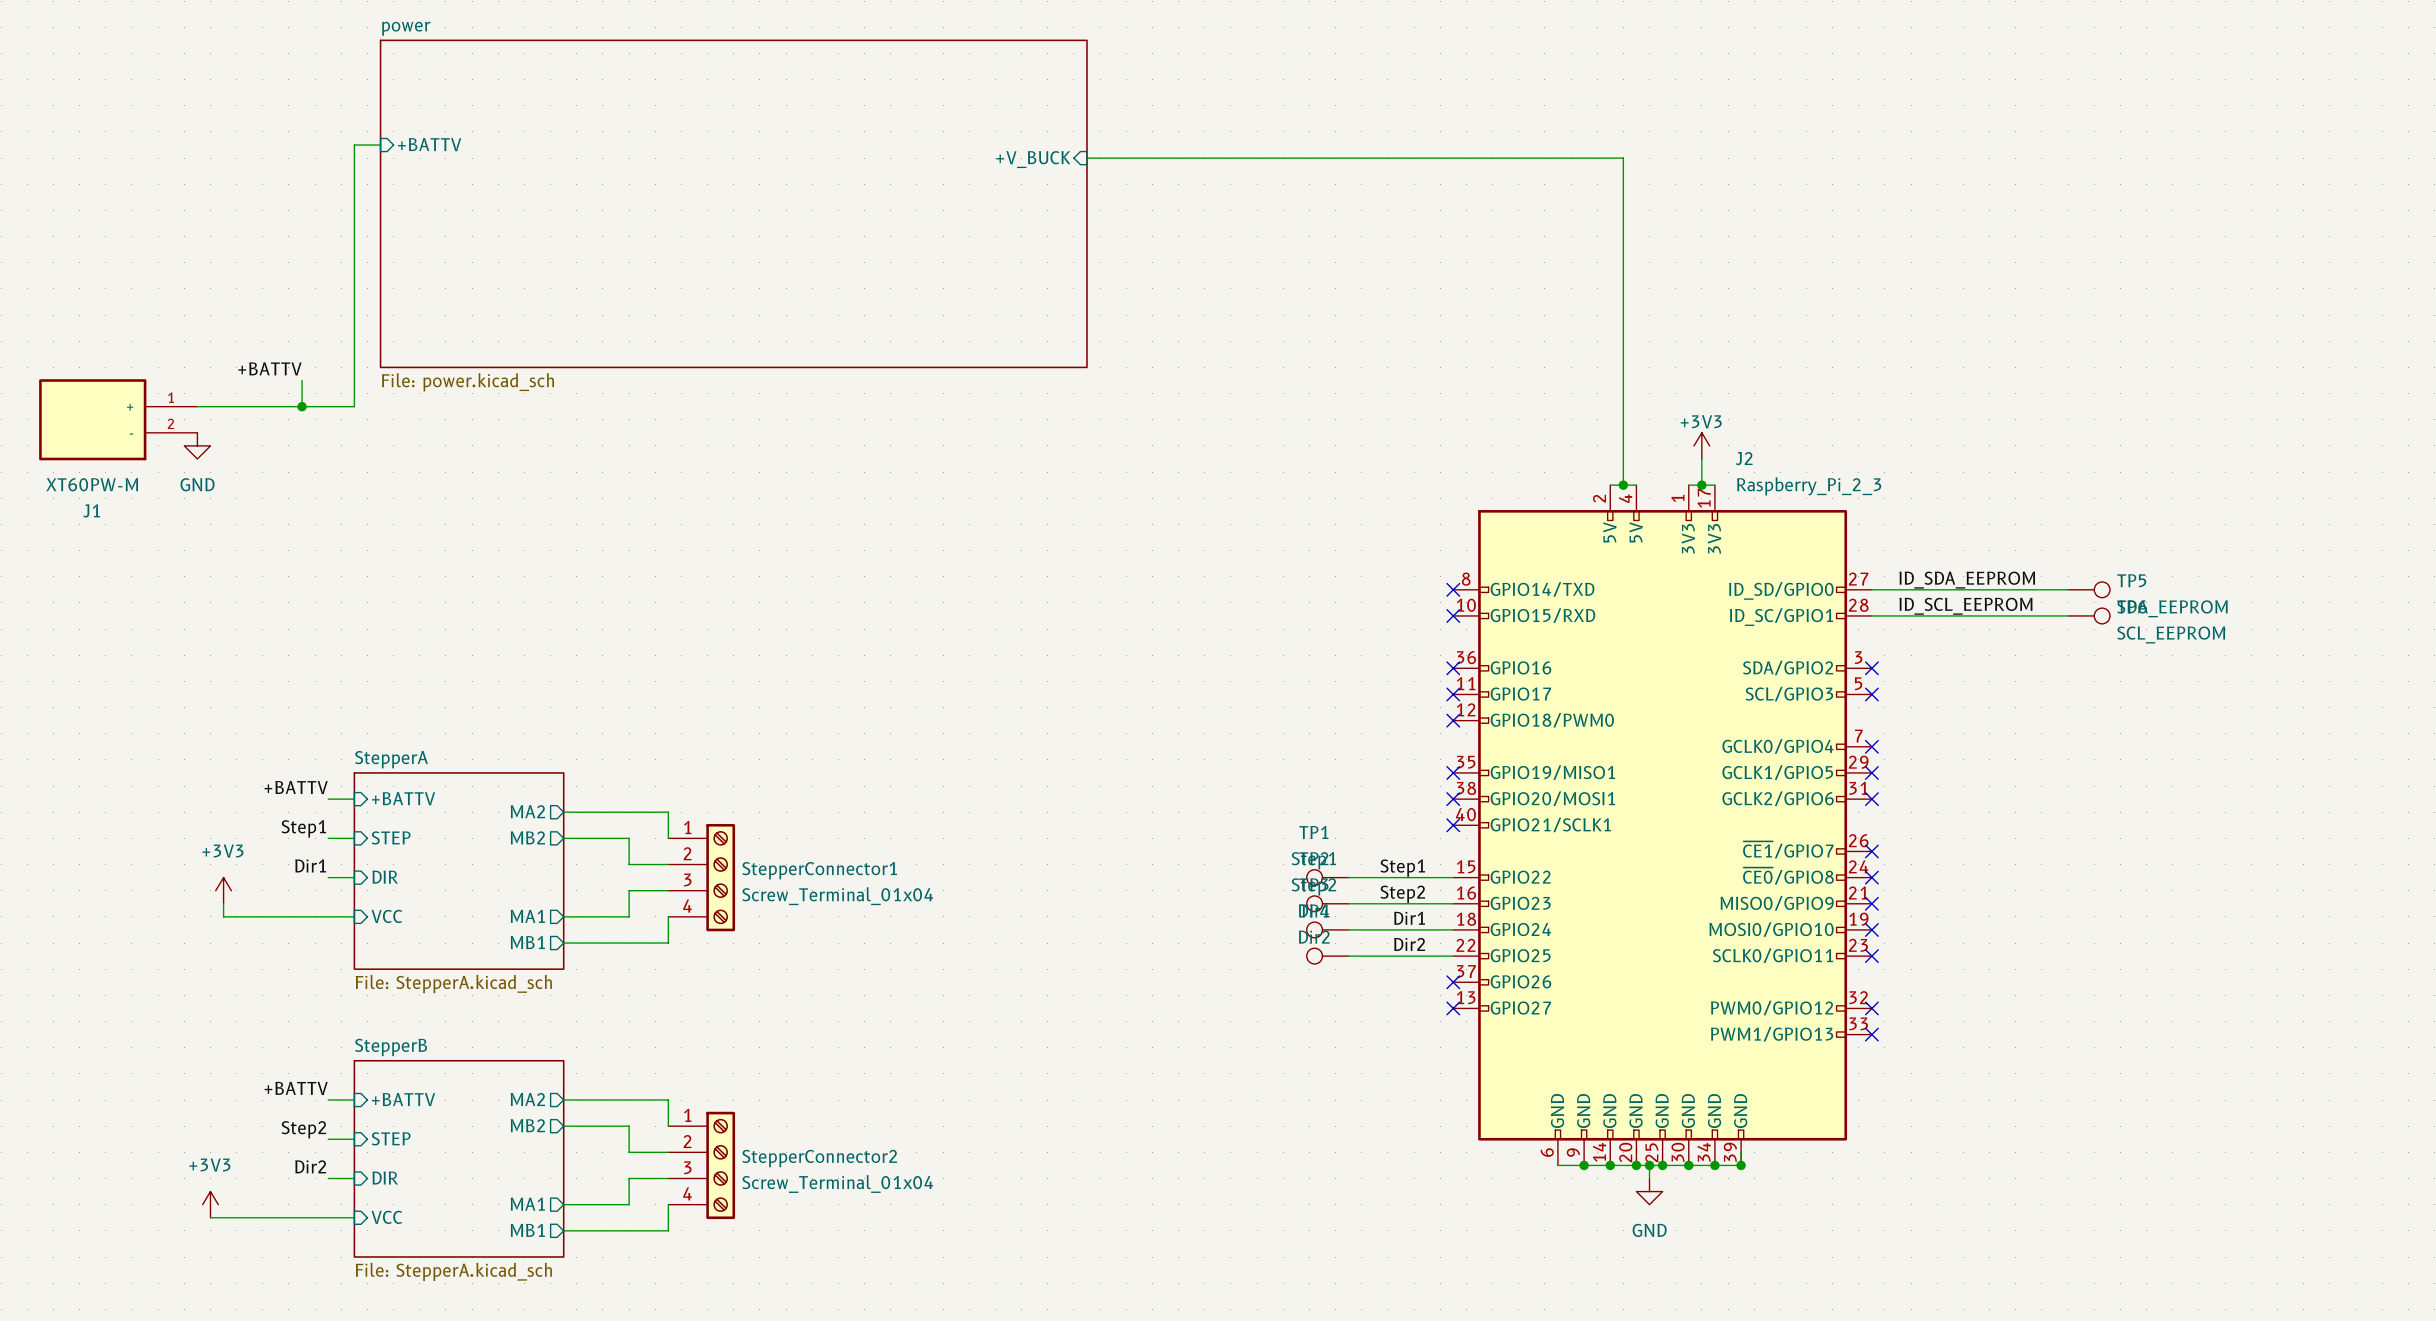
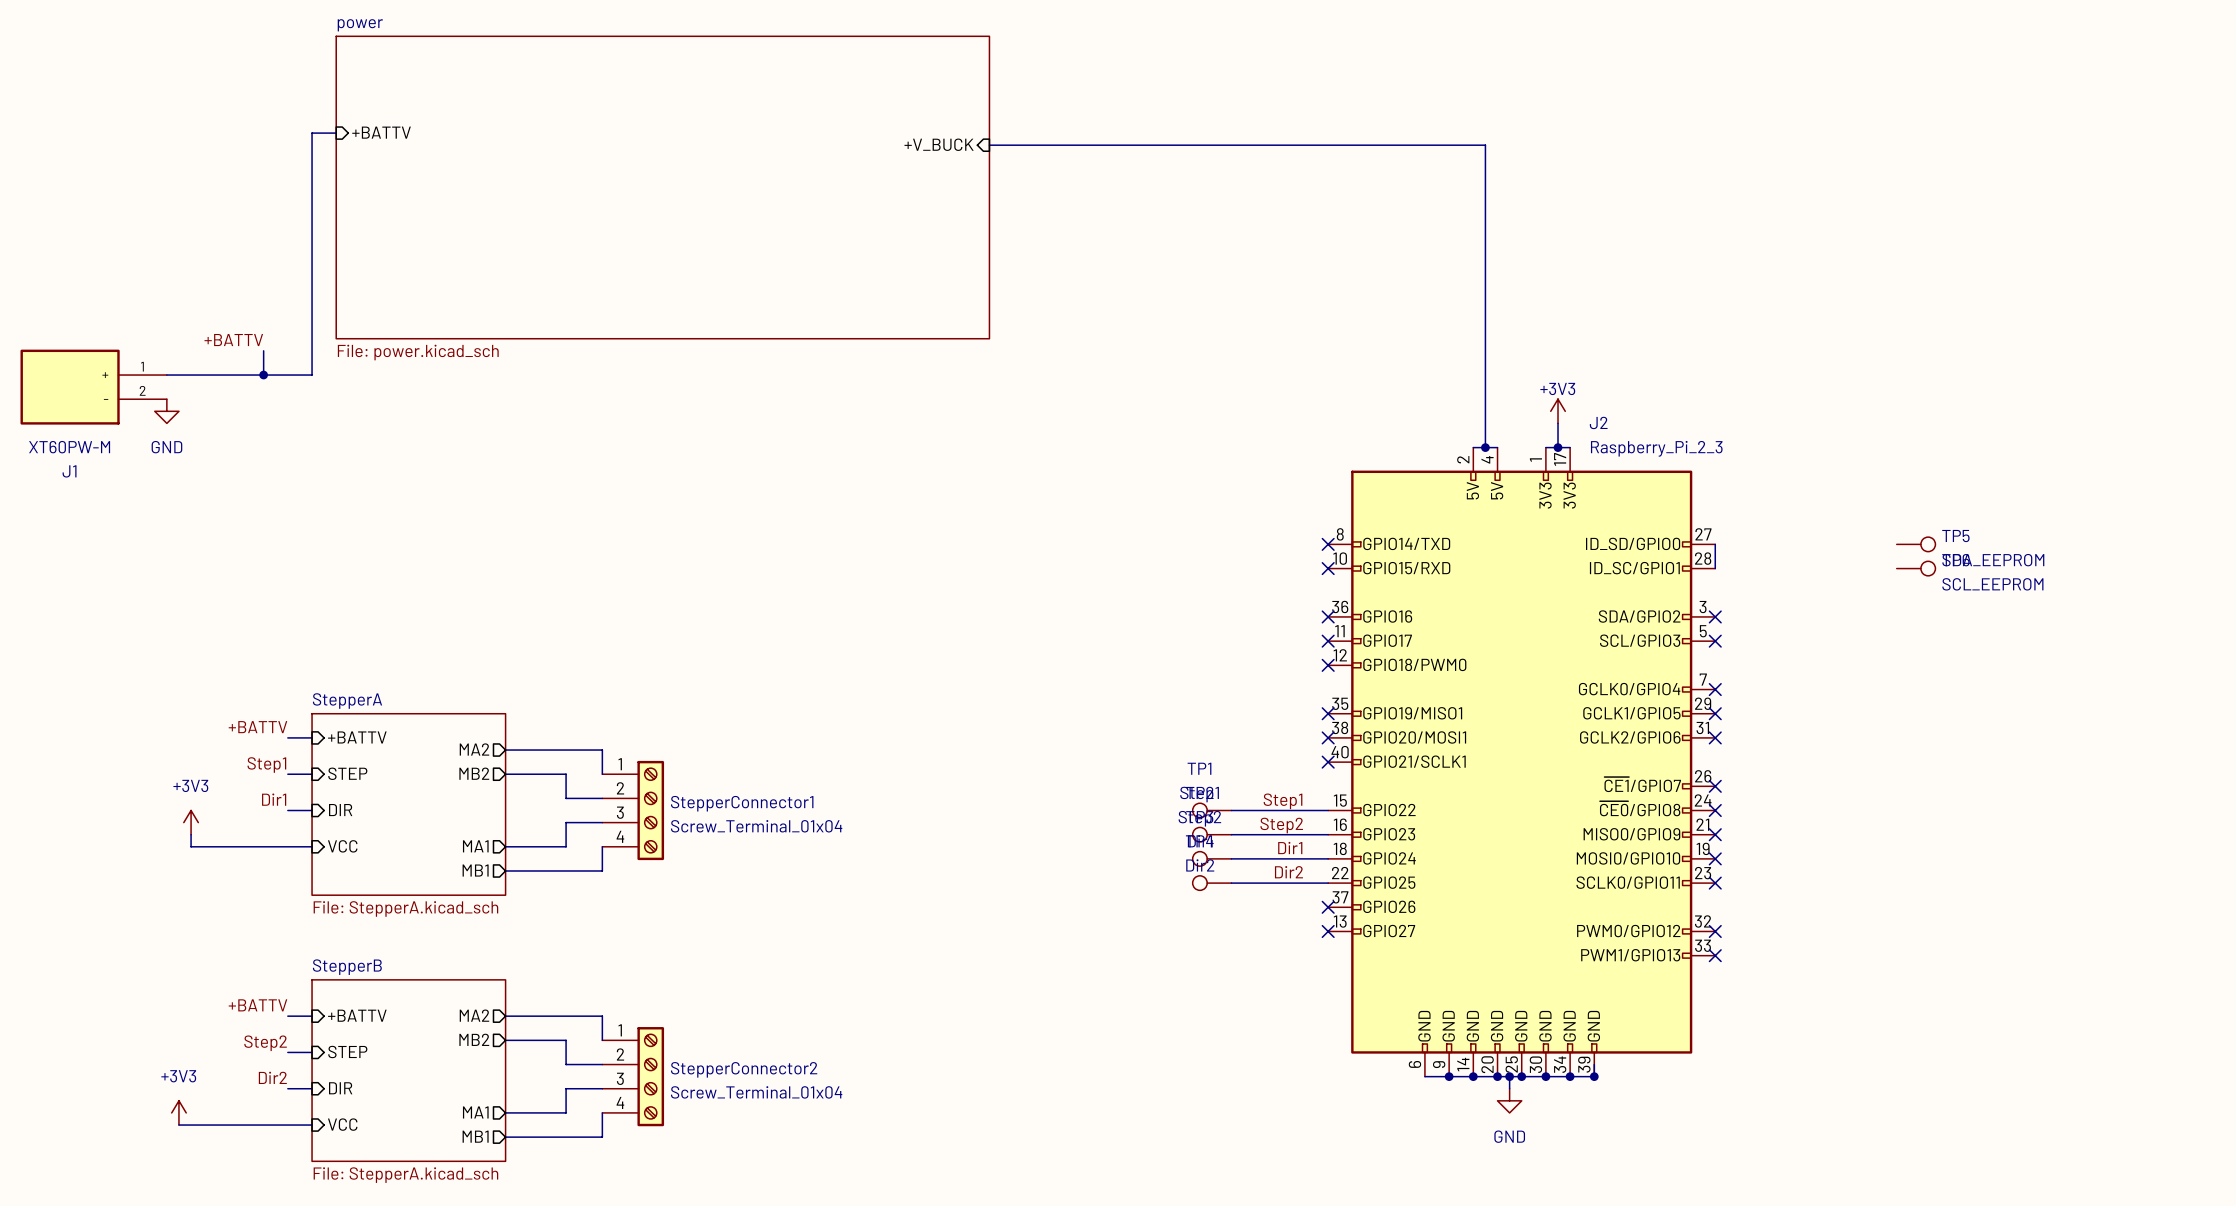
label: ID_SDA_EEPROM (1967, 580) -> none
wire: (1871, 589) (2068, 589) -> (1715, 544) (1715, 568)
label: ID_SCL_EEPROM (1965, 606) -> none
wire: (1871, 615) (2068, 615) -> none

